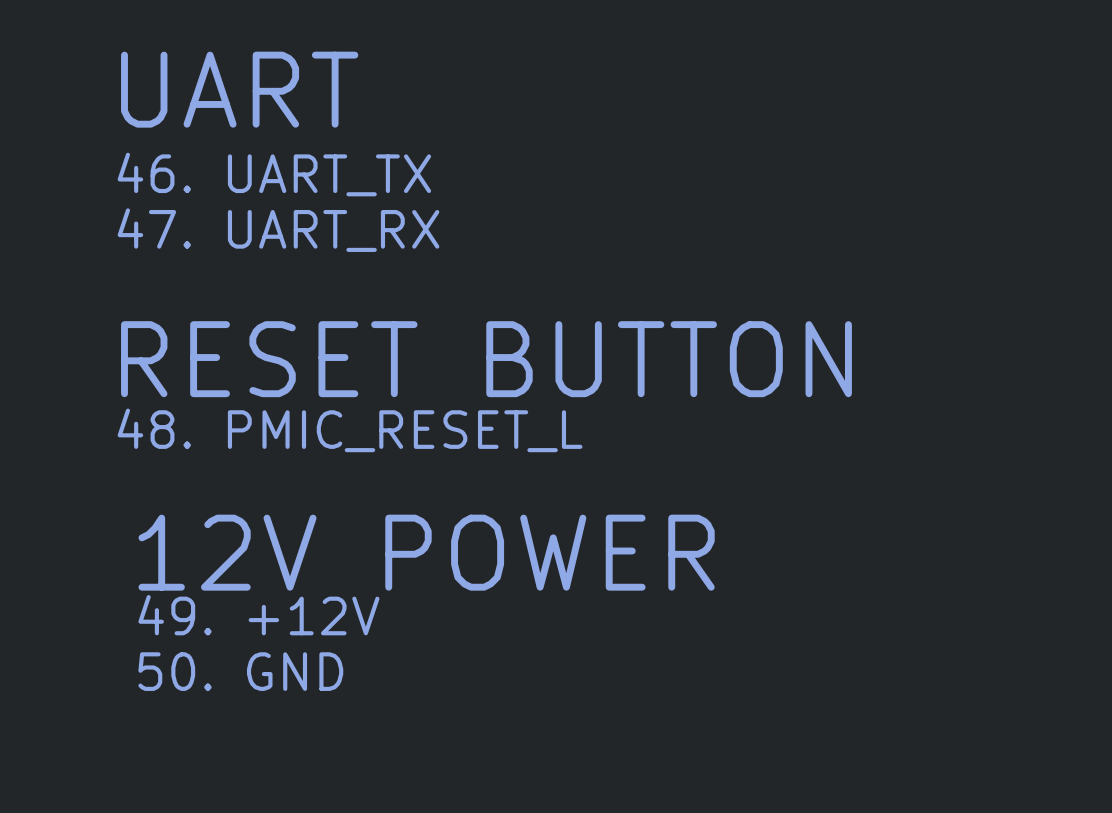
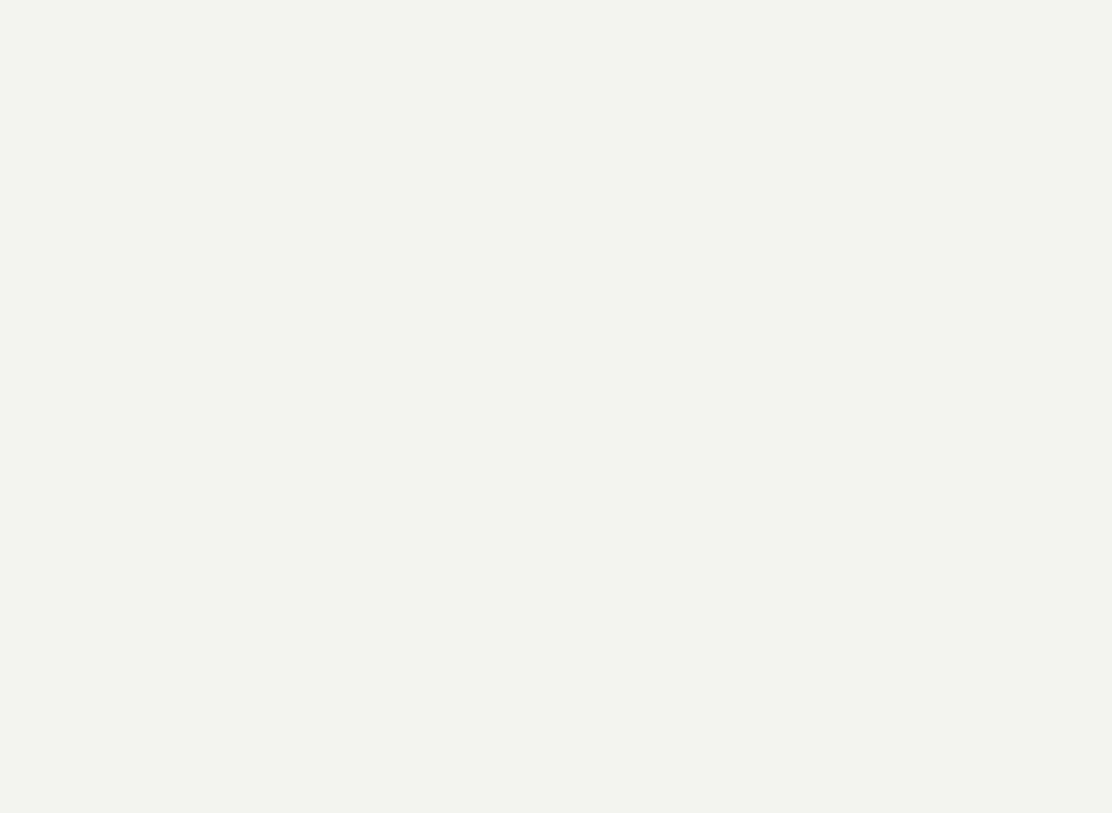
text: UART (239, 89) -> none
text: 46. UART_TX (274, 174) -> none
text: 47. UART_RX (278, 230) -> none
text: RESET BUTTON (486, 359) -> none
text: 48. PMIC_RESET_L (350, 430) -> none
text: 12V POWER (426, 552) -> none
text: 49. +12V (258, 615) -> none
text: 50. GND (240, 671) -> none

